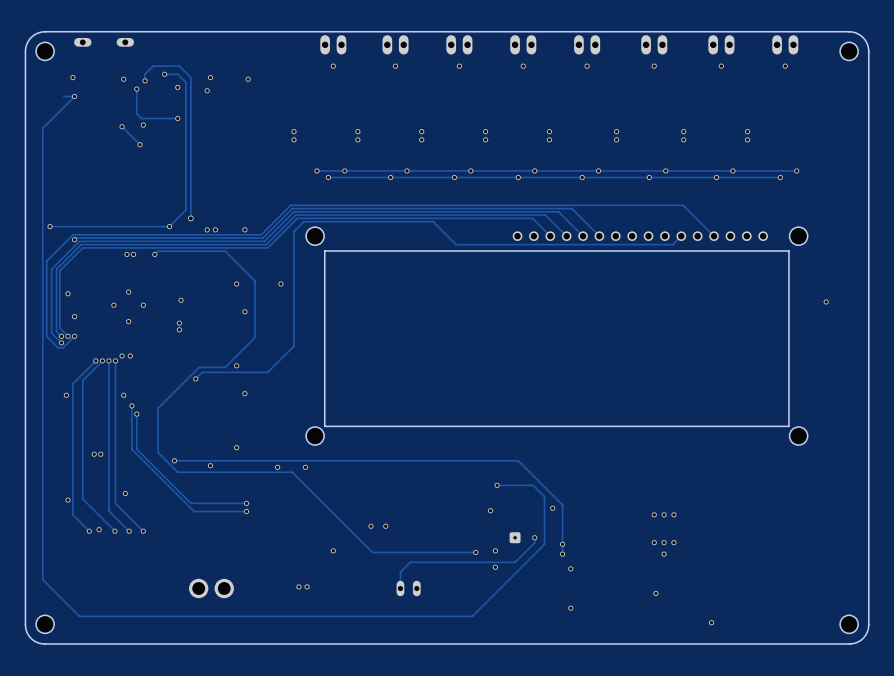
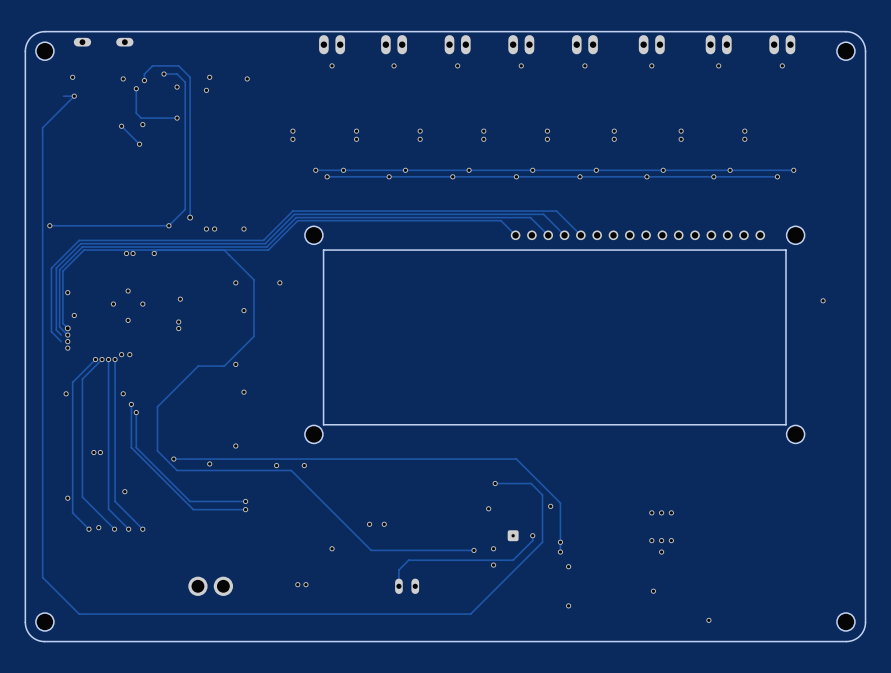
track: none -> (515, 235) (500, 220) (297, 220) (268, 250) (84, 250) (62, 271) (62, 323) (67, 328)
track: (599, 236) (571, 208) (292, 208) (262, 238) (76, 238) (74, 239) -> none
track: (681, 236) (672, 244) (456, 244) (433, 221) (303, 221) (294, 231) (294, 346) (267, 372) (202, 372) (195, 378) -> none
track: (714, 236) (683, 205) (290, 205) (261, 234) (72, 234) (46, 261) (46, 336) (58, 347) (63, 347) (74, 336) -> none
via: (74, 239) -> none
via: none -> (67, 328)
via: (61, 336) -> none
via: (74, 336) -> none
via: (61, 342) -> none
via: none -> (67, 341)
via: none -> (67, 348)
via: (195, 378) -> none

